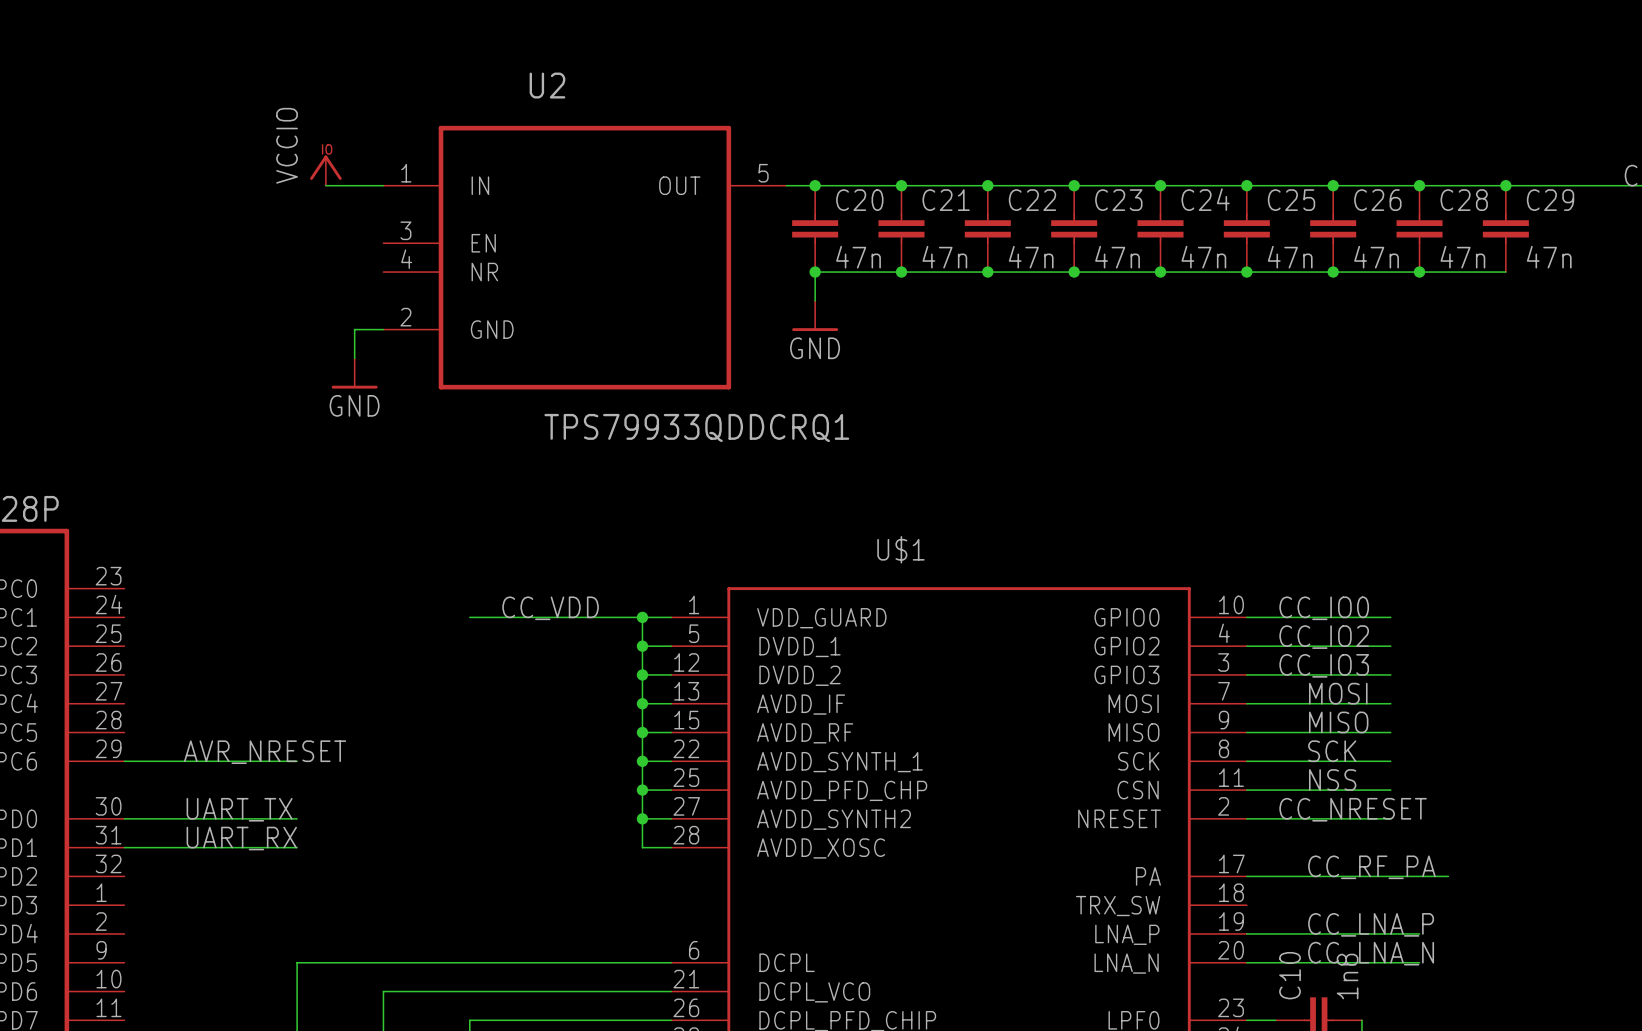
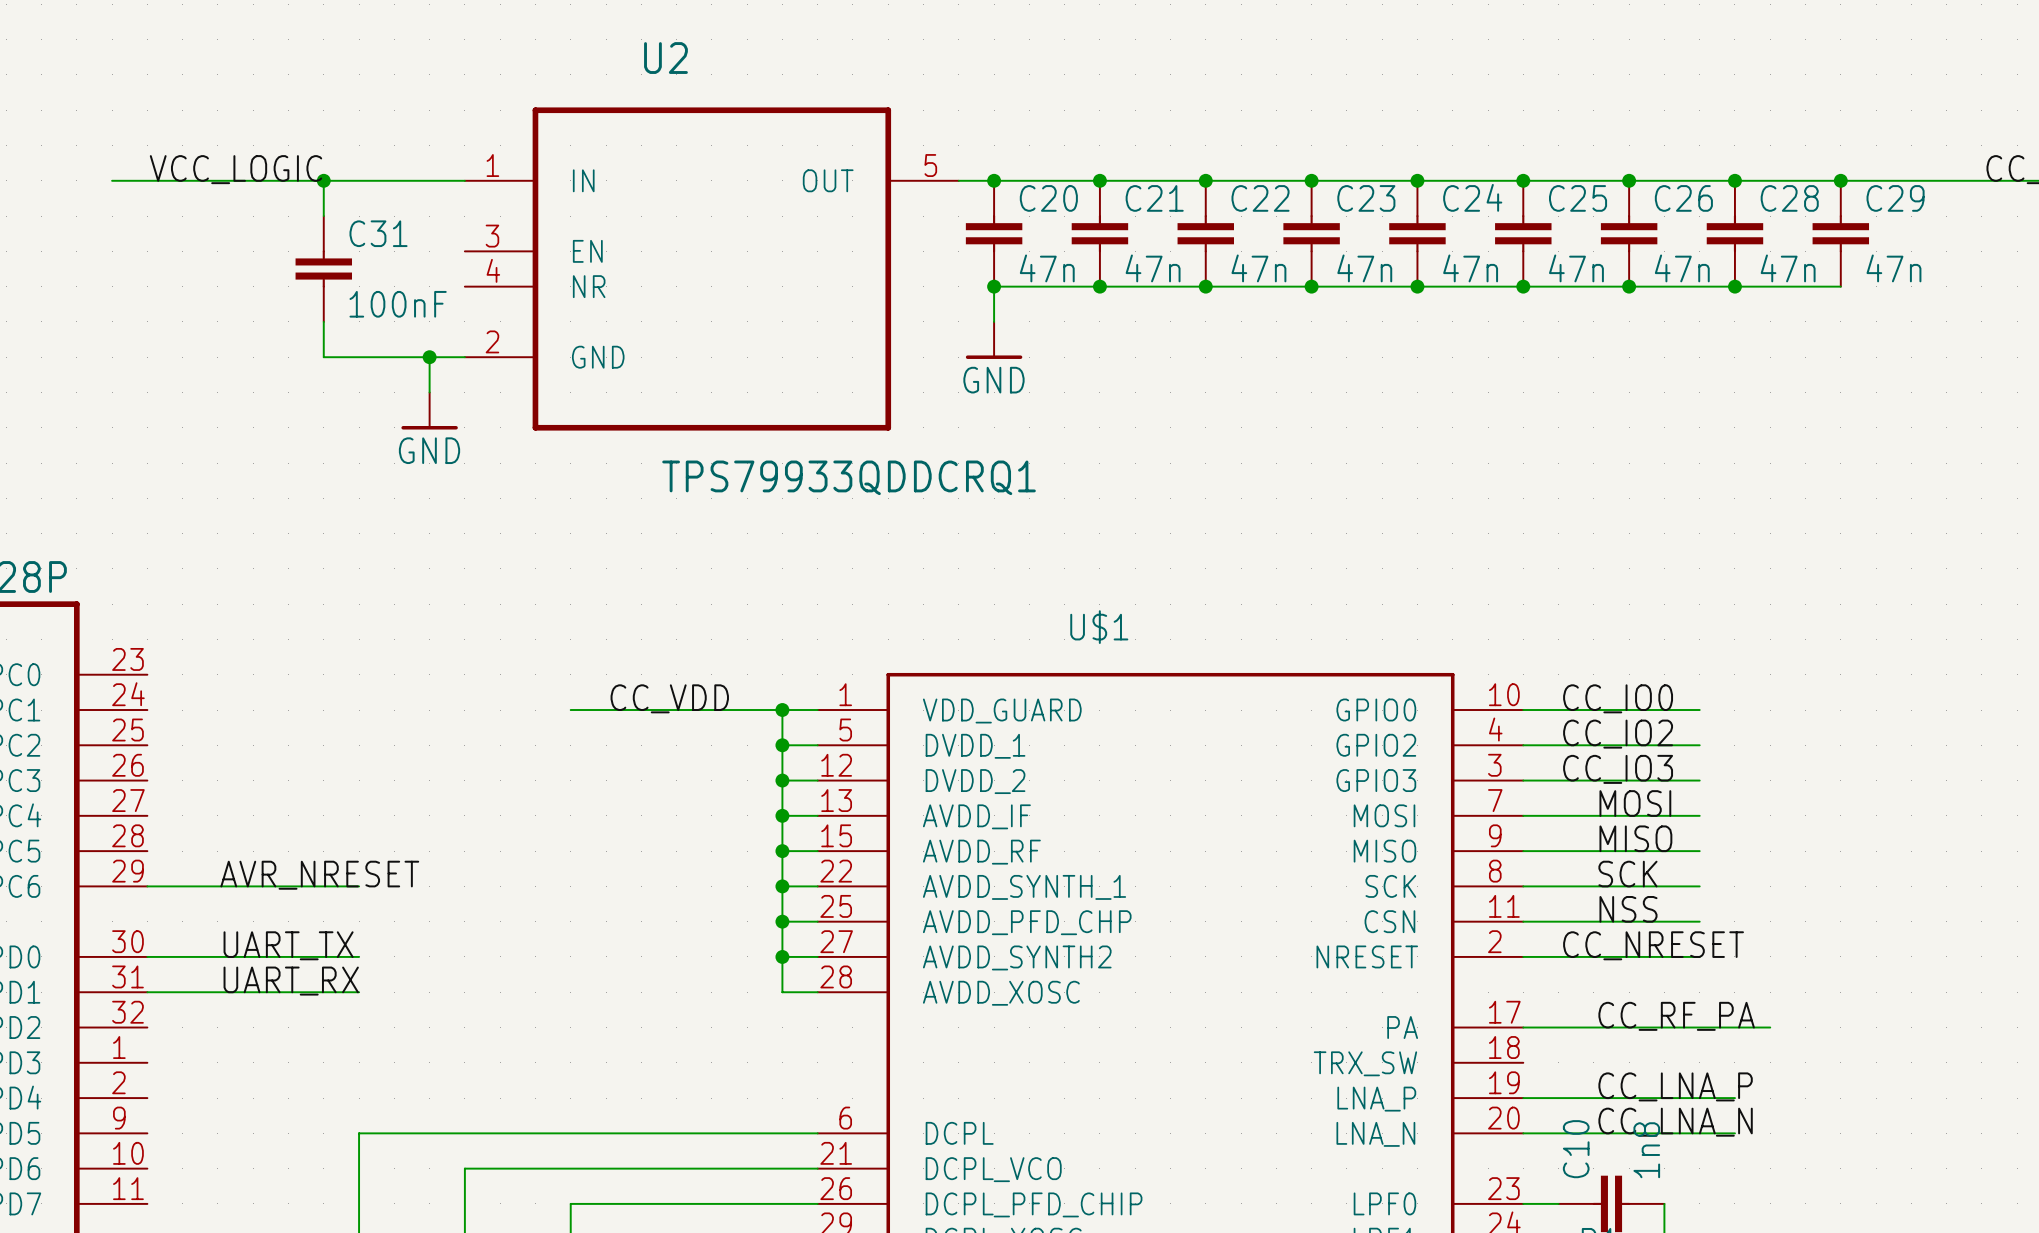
power symbol: VCCIO (325, 170) -> none
label: none -> VCC_LOGIC (235, 169)
wire: none -> (112, 180) (394, 180)
wire: none -> (323, 180) (323, 216)
junction: none -> (323, 180)
C31: none -> 100nF (323, 269)
wire: none -> (323, 321) (323, 357) (429, 357)
junction: none -> (429, 357)

